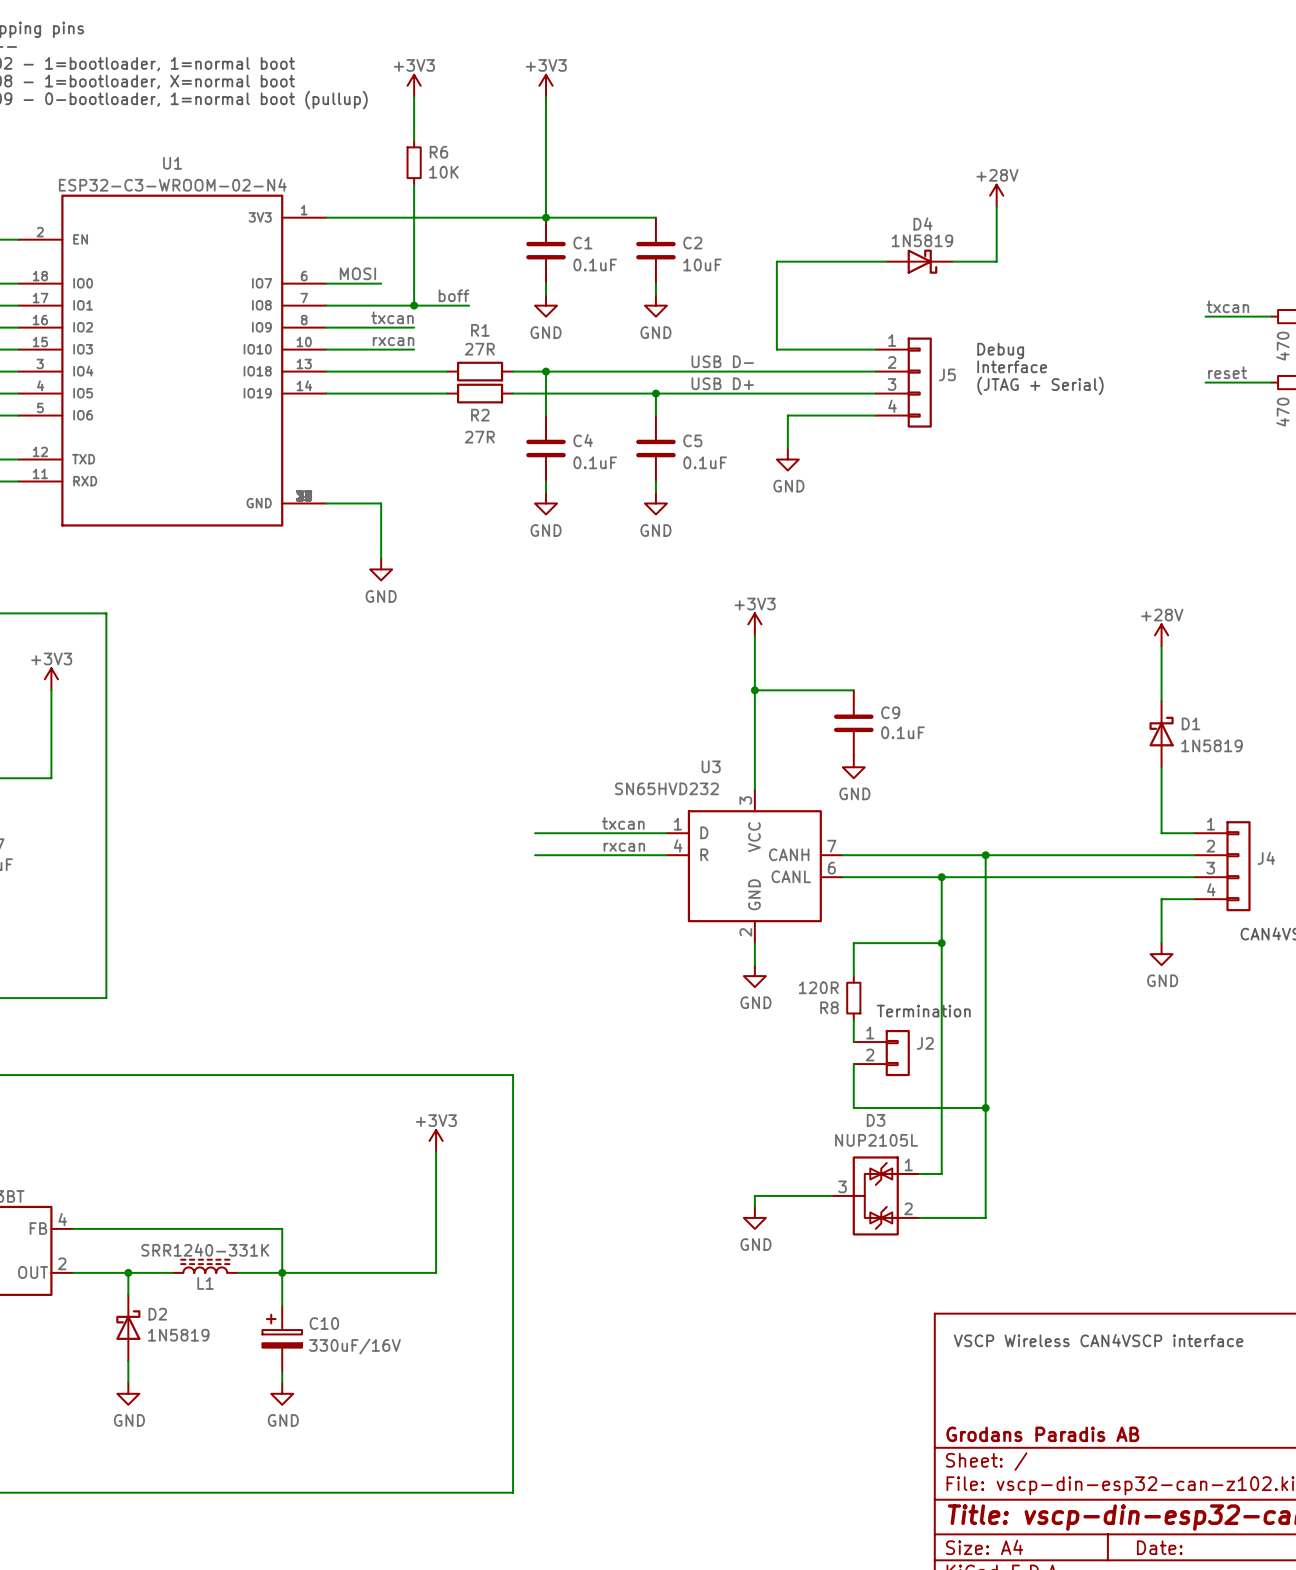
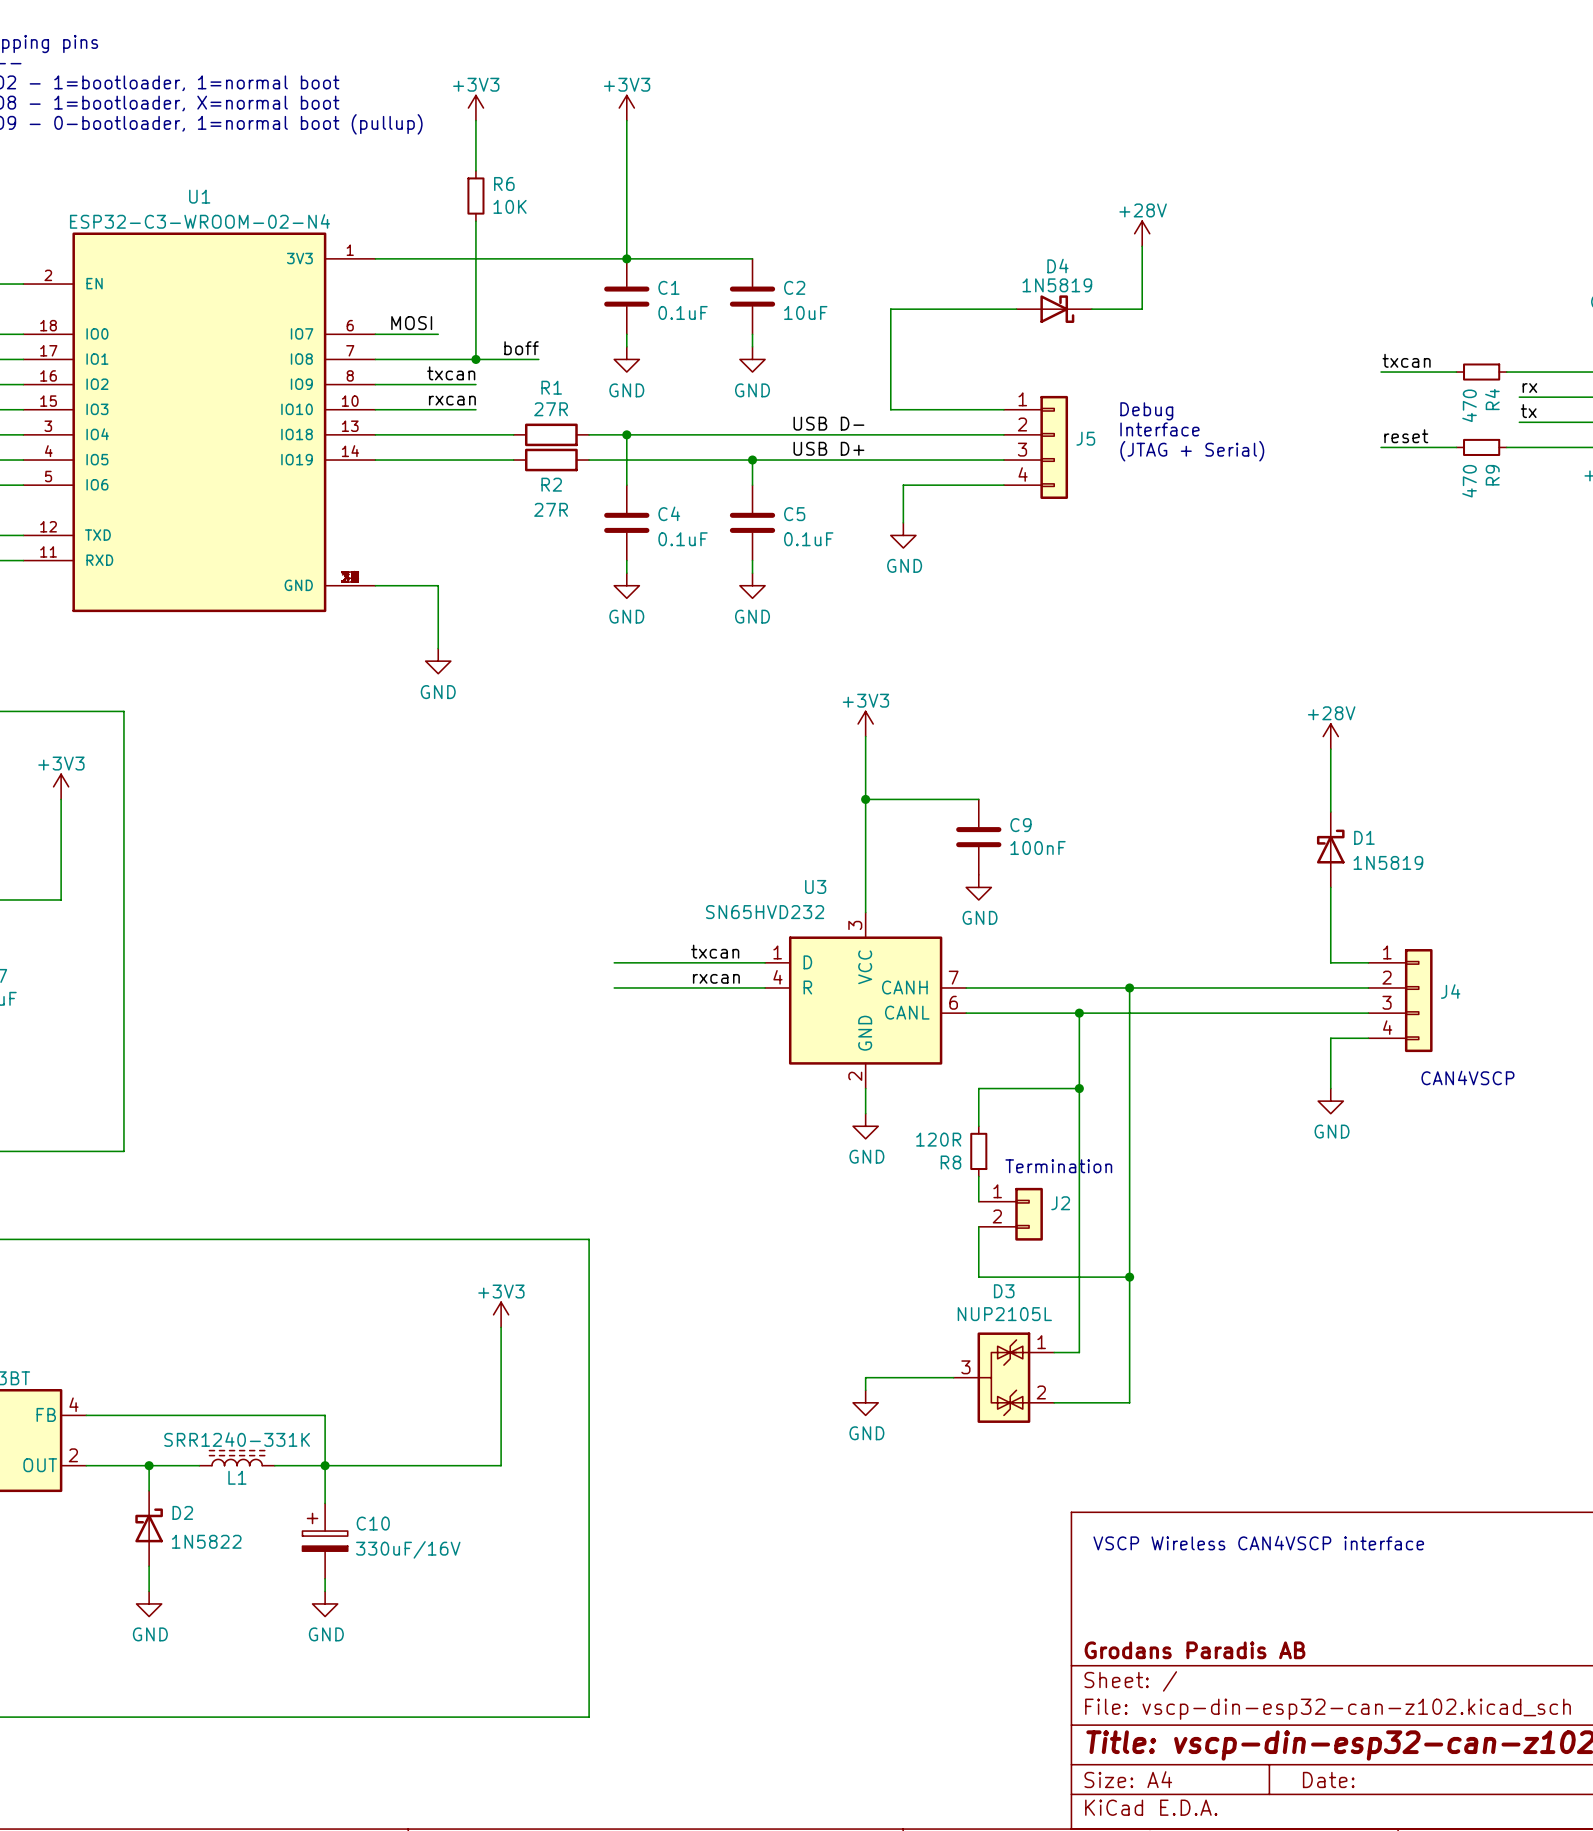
C9 value: 0.1uF (902, 732) -> 100nF (1038, 847)
D2 value: 1N5819 (178, 1335) -> 1N5822 (206, 1541)

